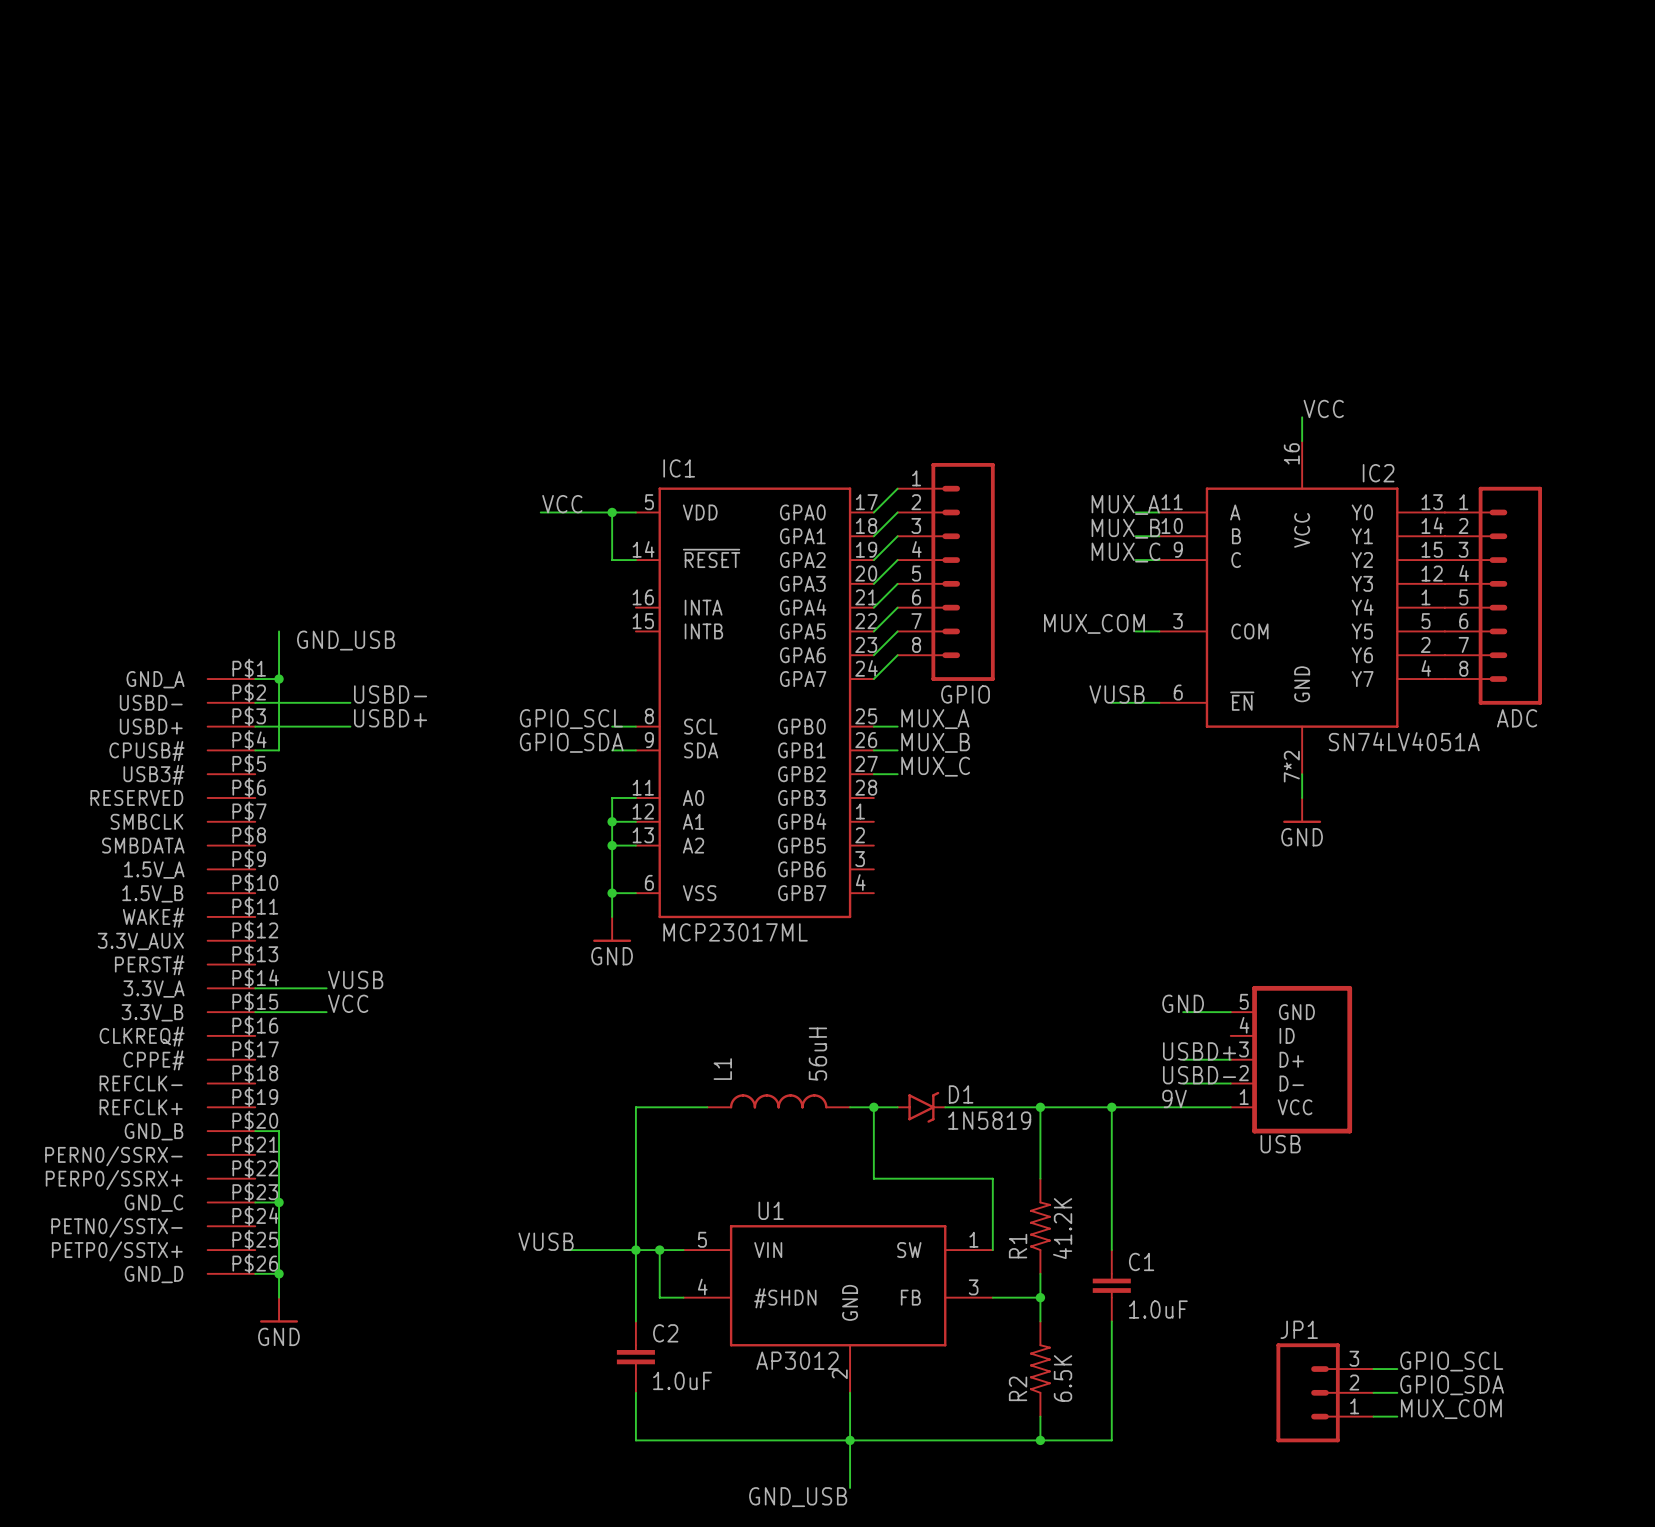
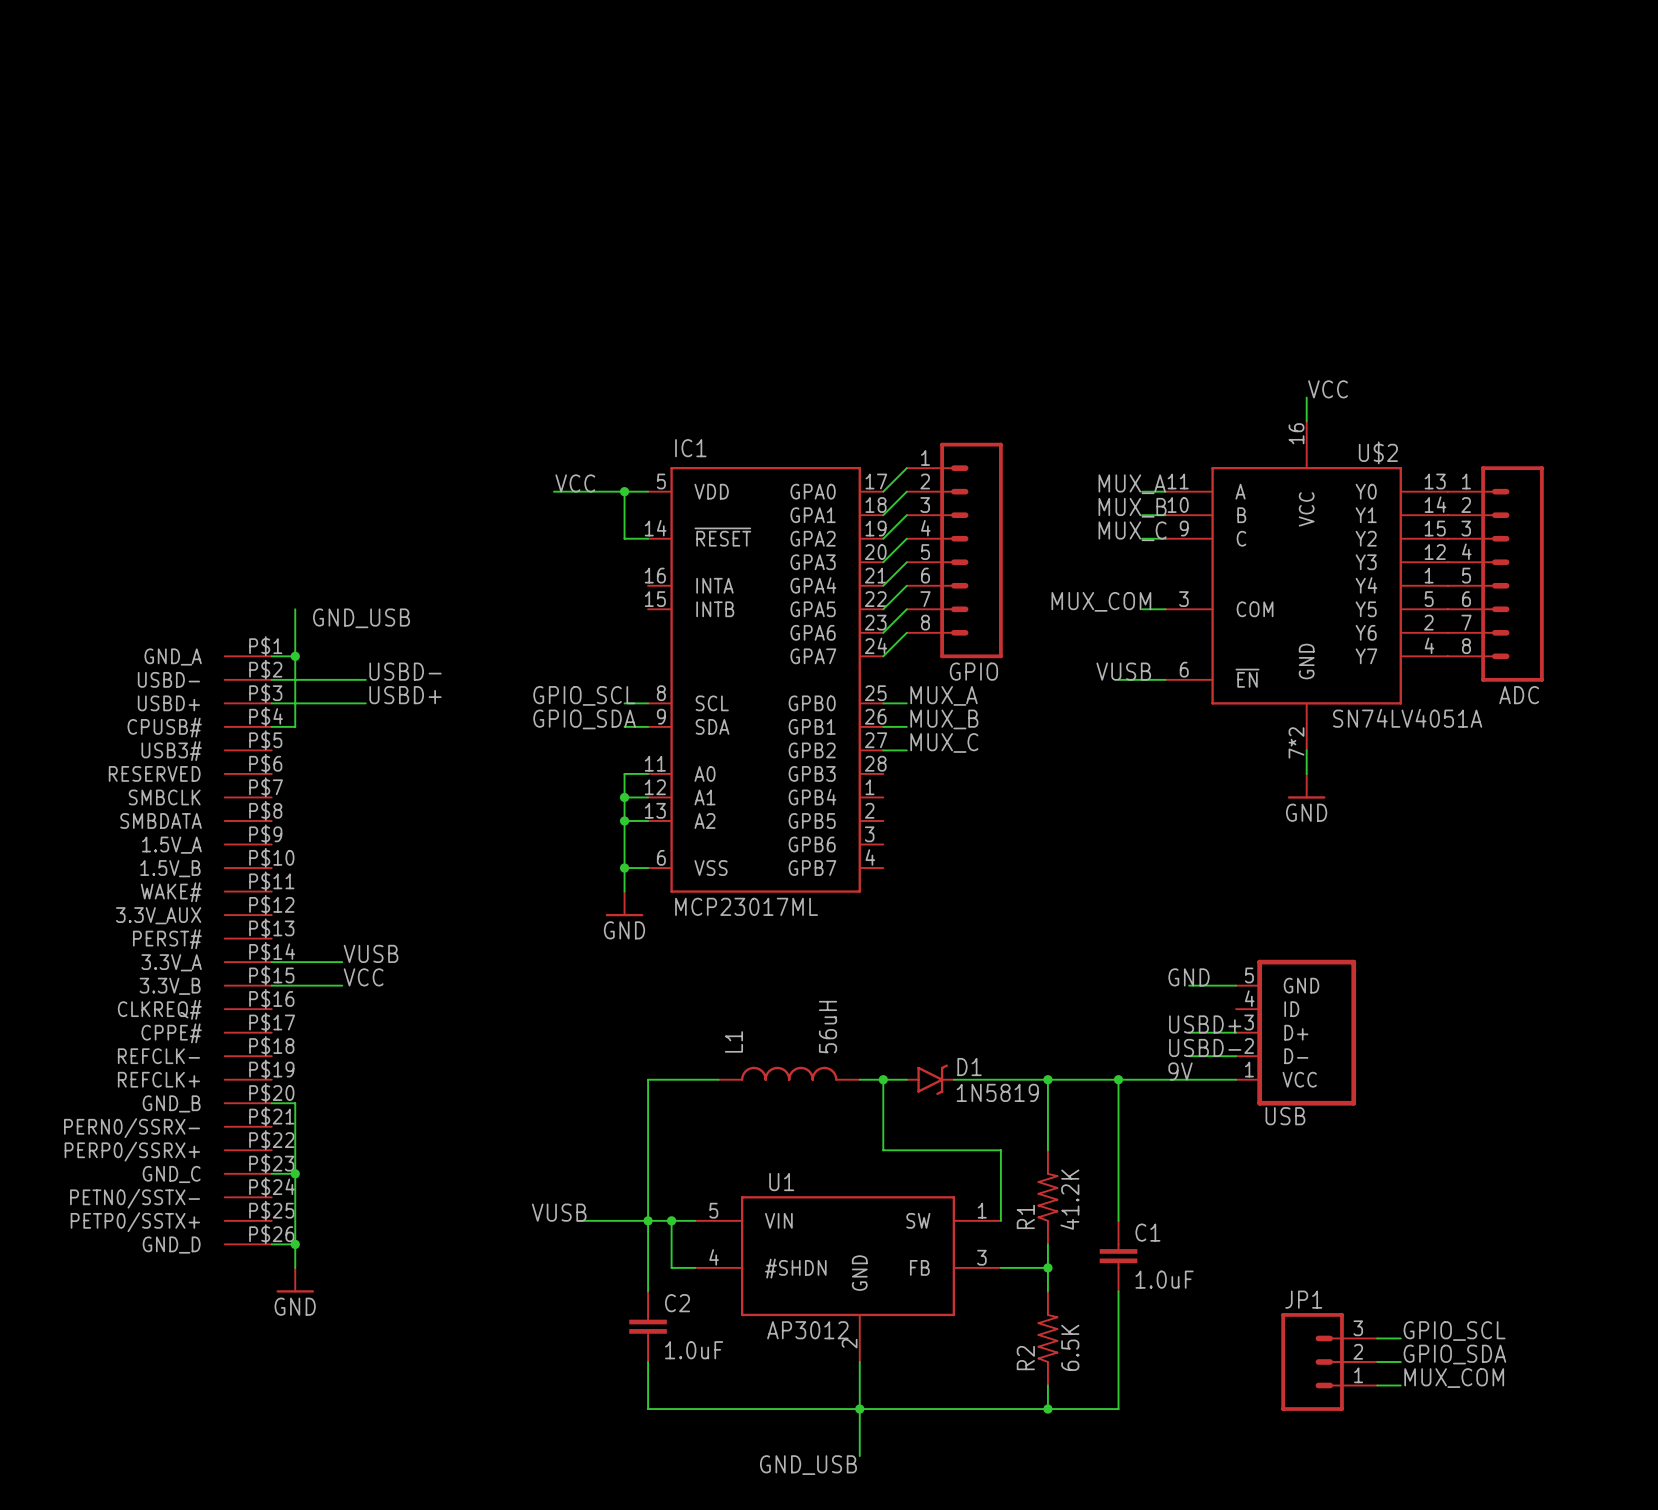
IC2 name: IC2 (1378, 473) -> U$2 (1378, 452)

